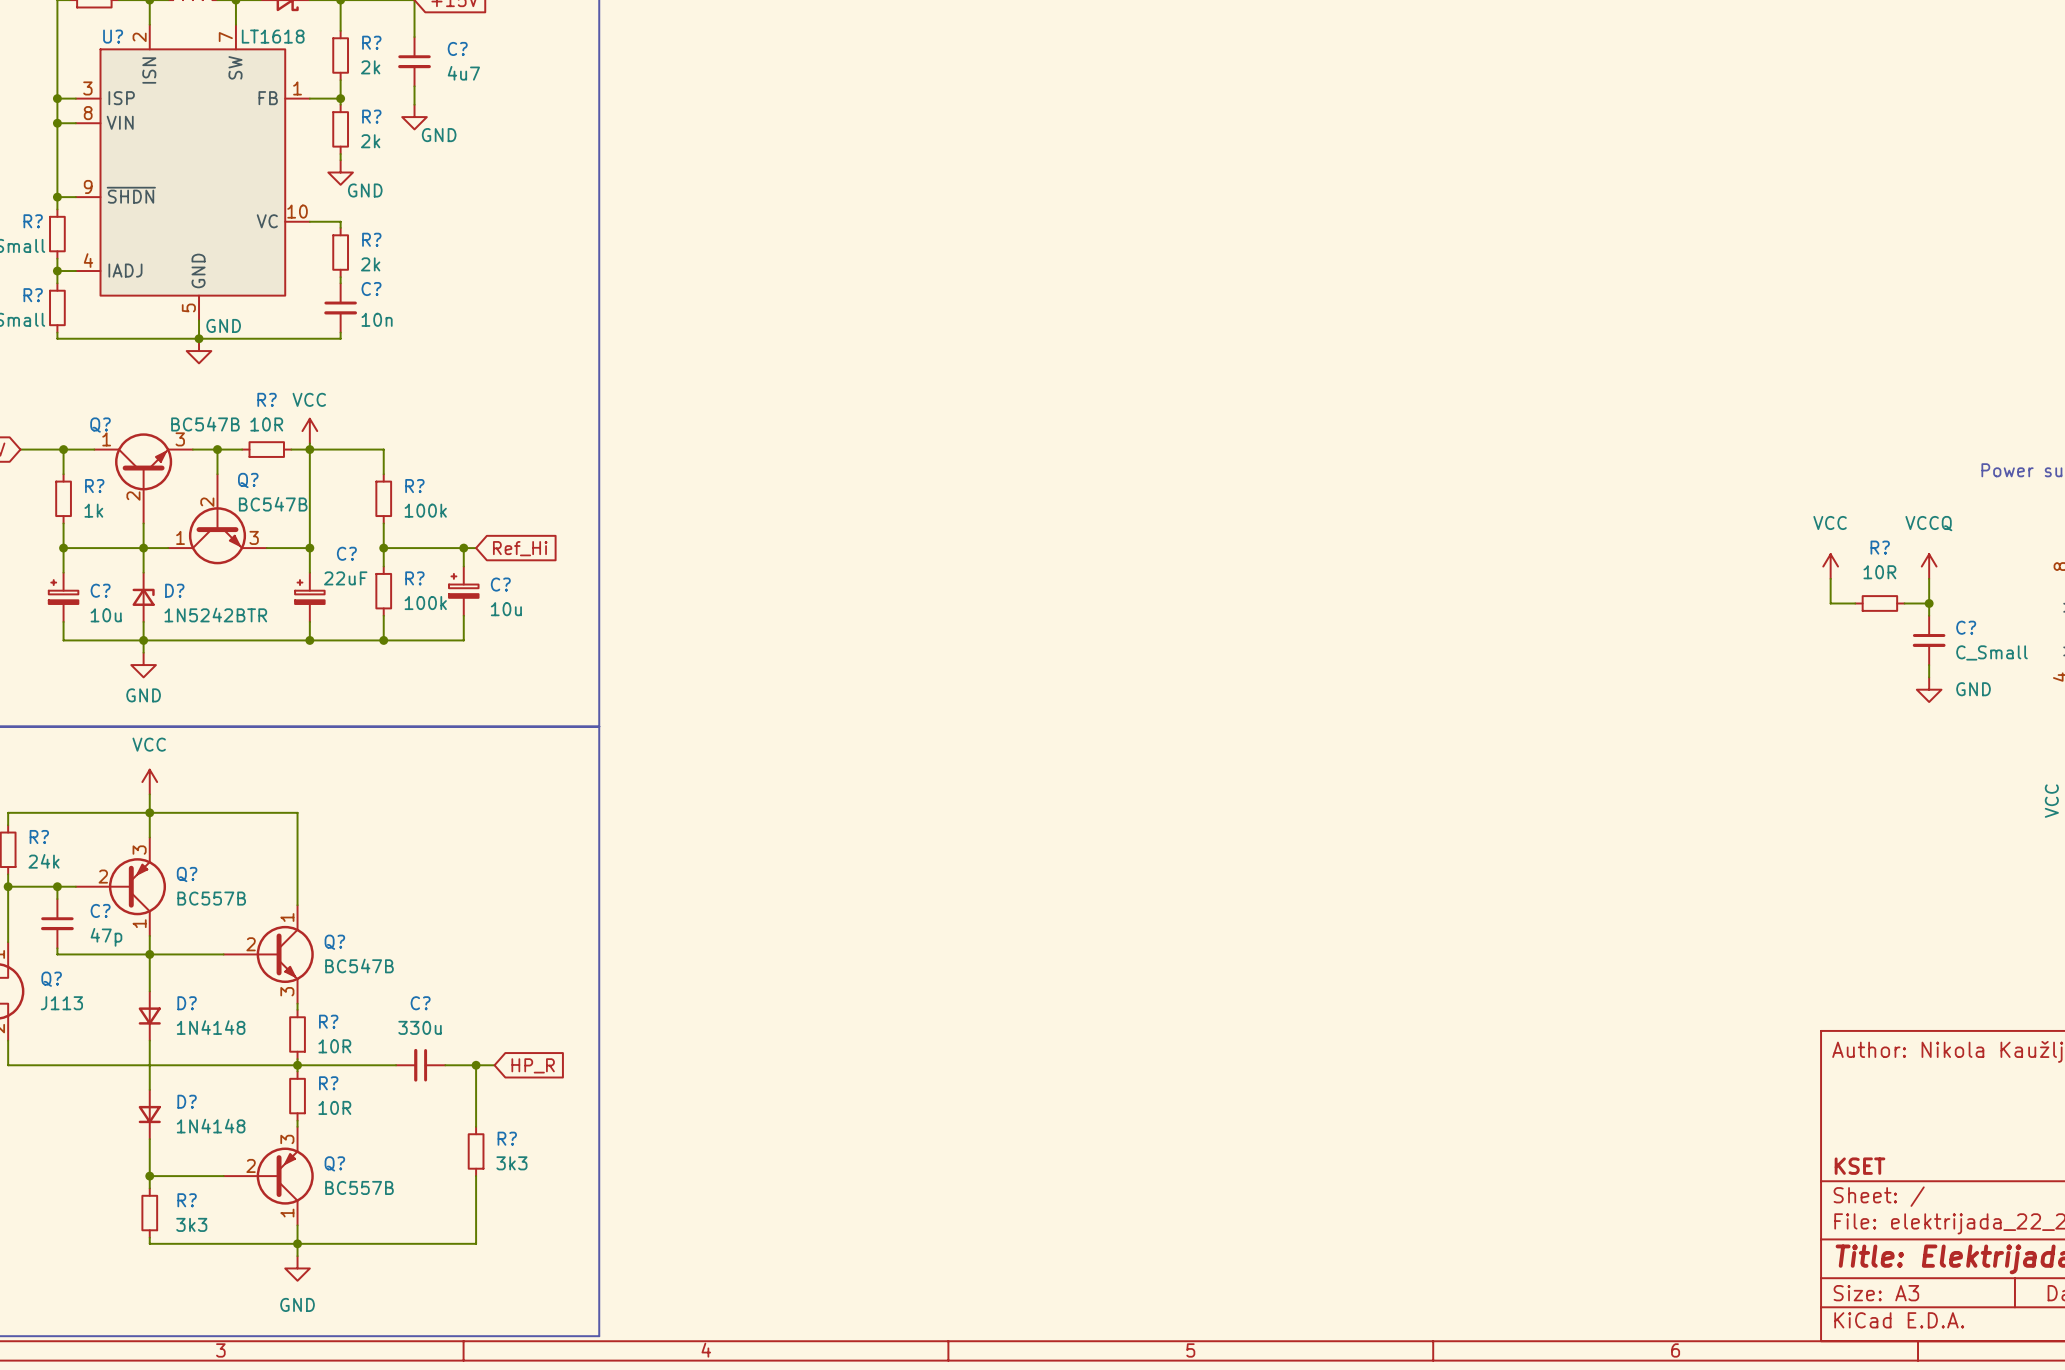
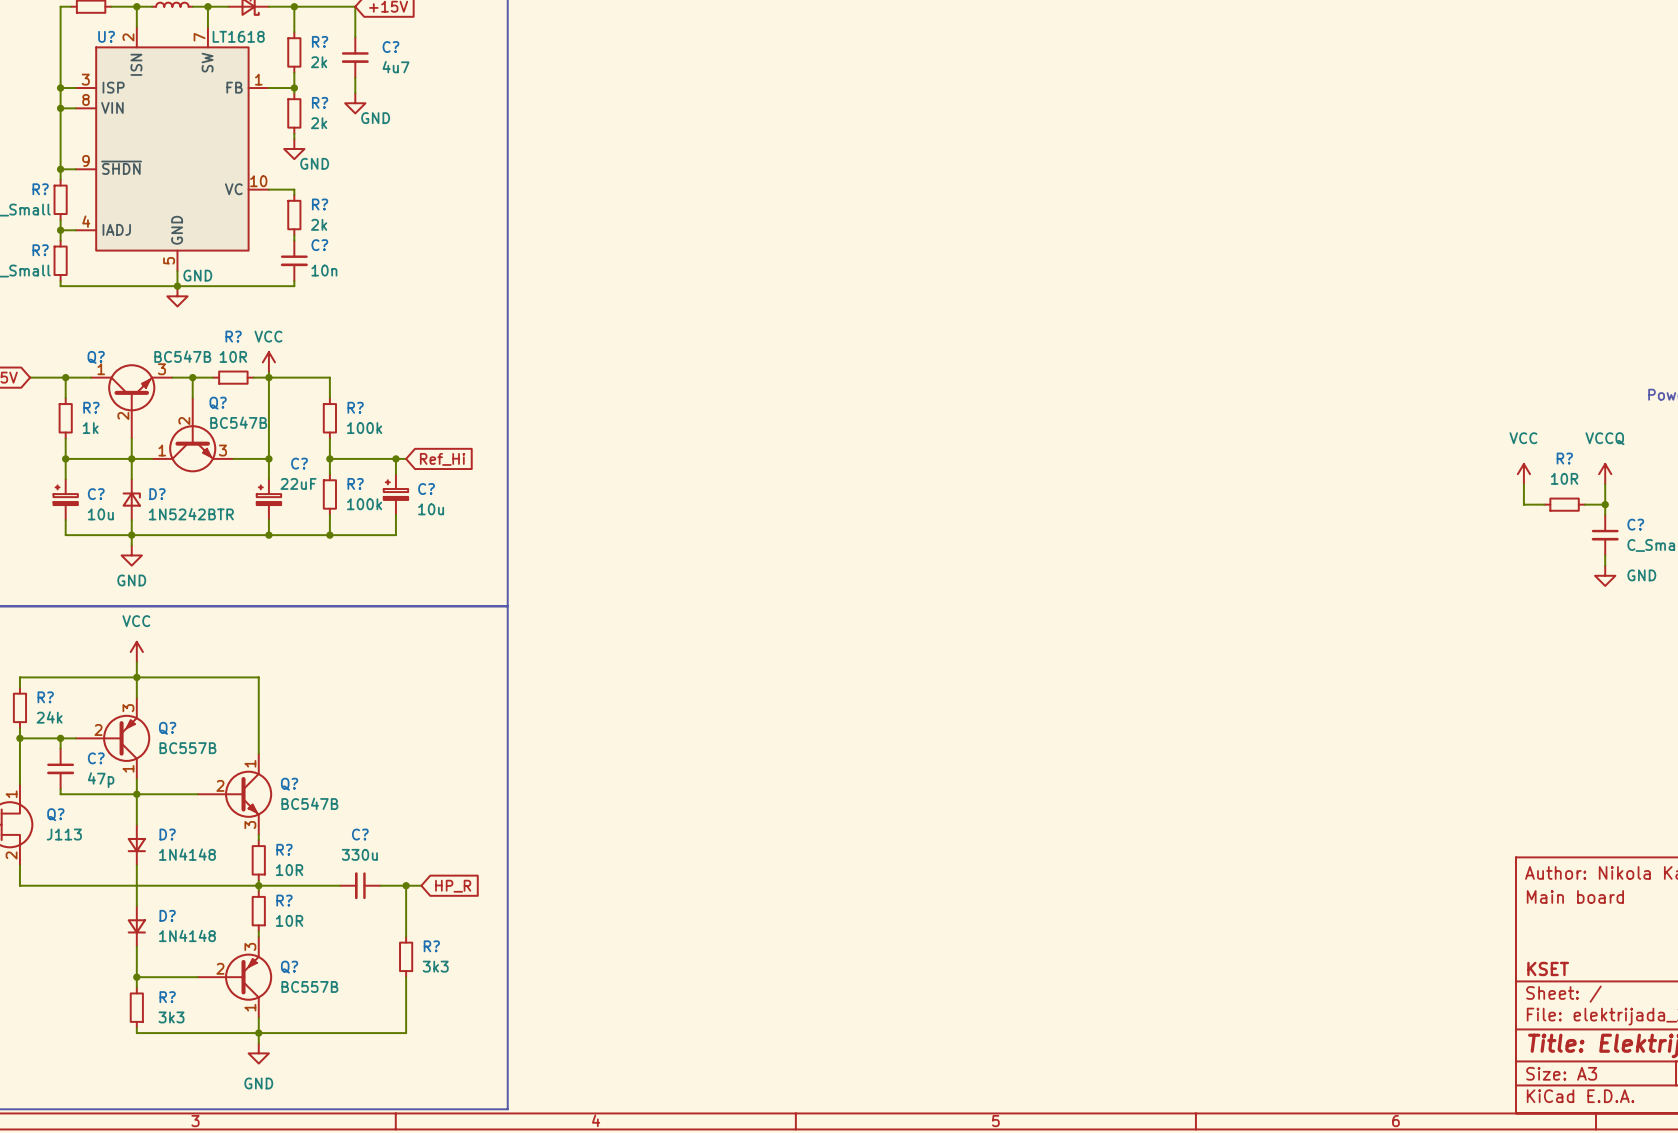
title block: none -> Main board (1575, 896)

